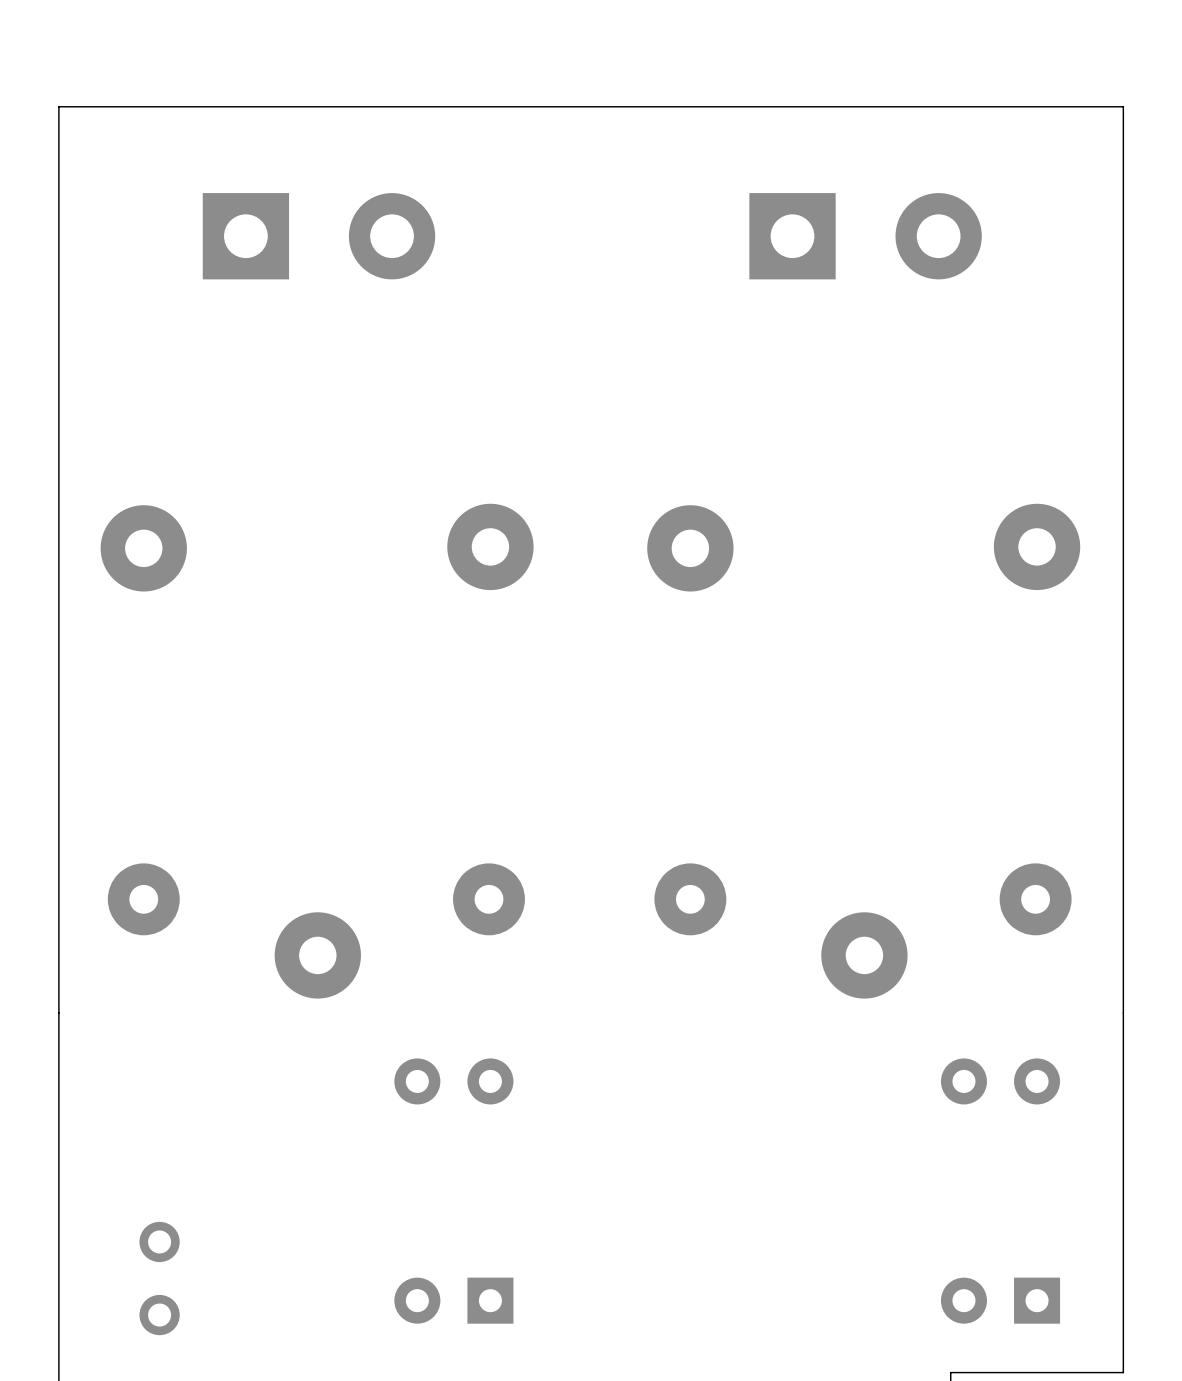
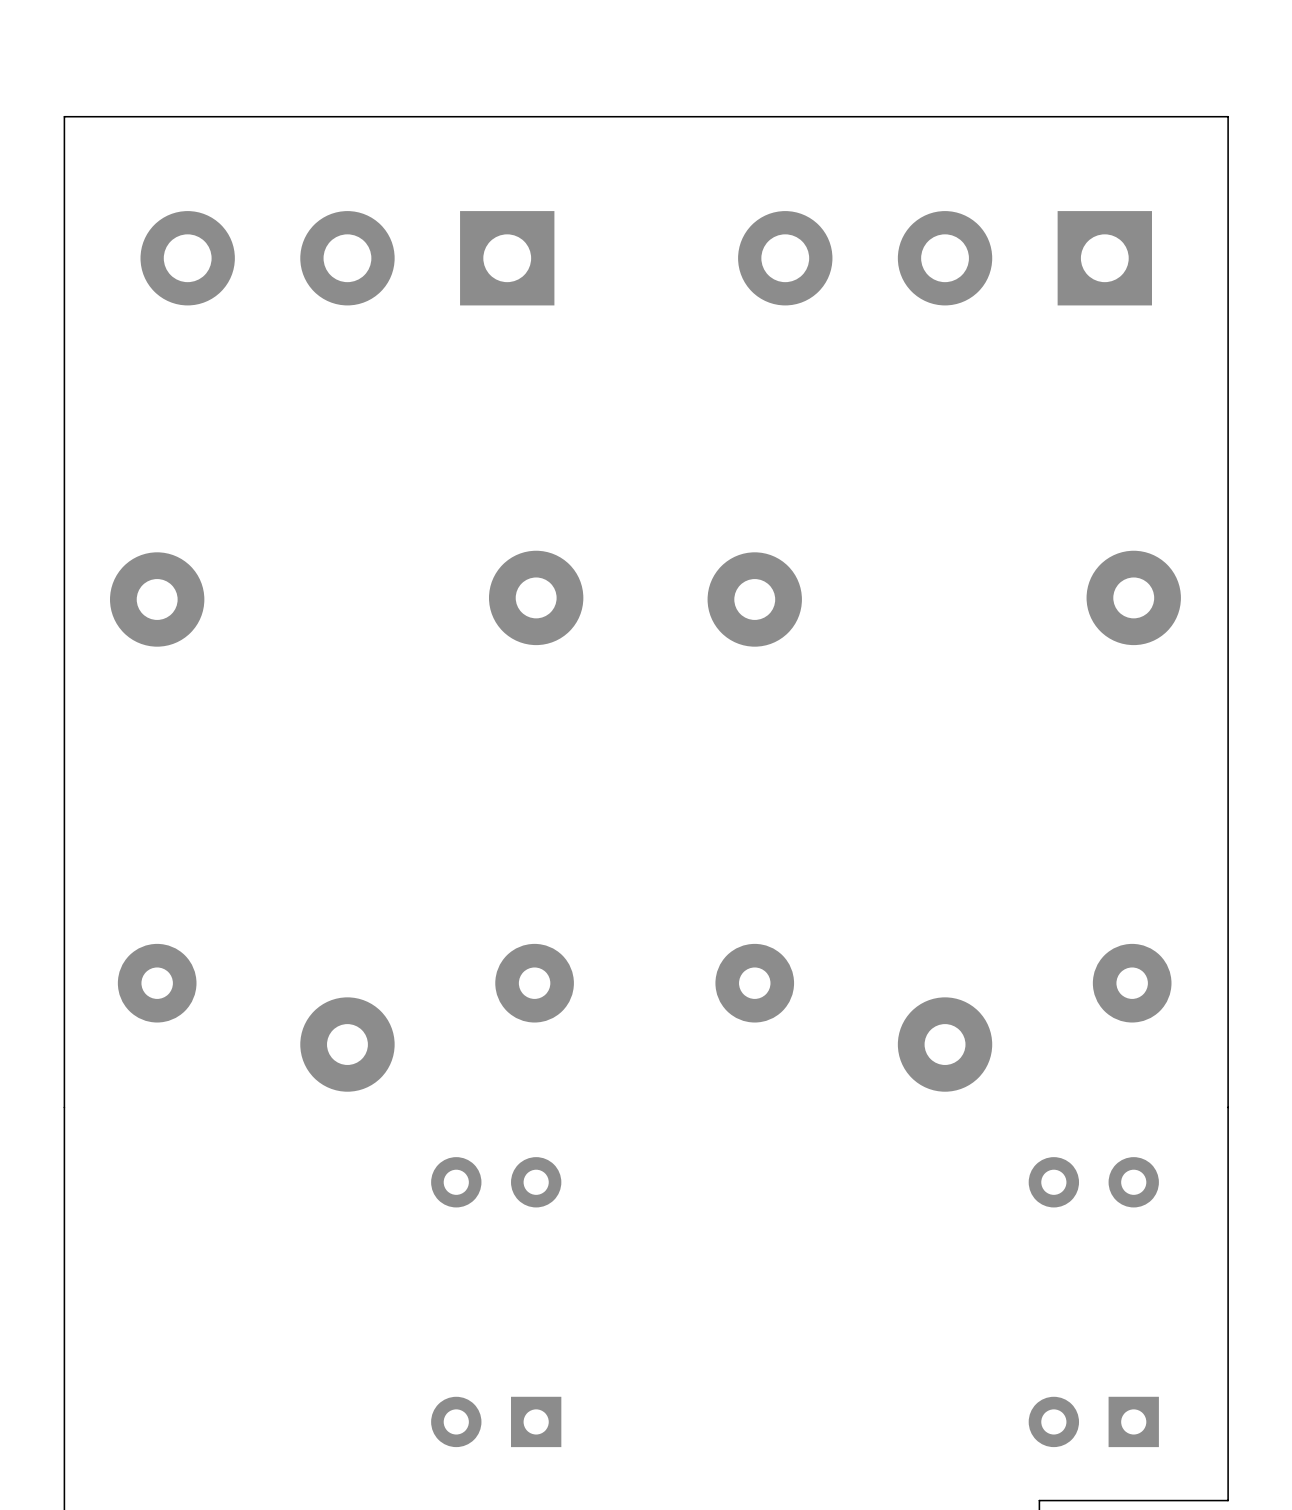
part footprint: [202, 193, 436, 280] -> [140, 211, 555, 306]
part footprint: [749, 193, 982, 280] -> [738, 211, 1152, 306]
part: (159, 1278) -> none

